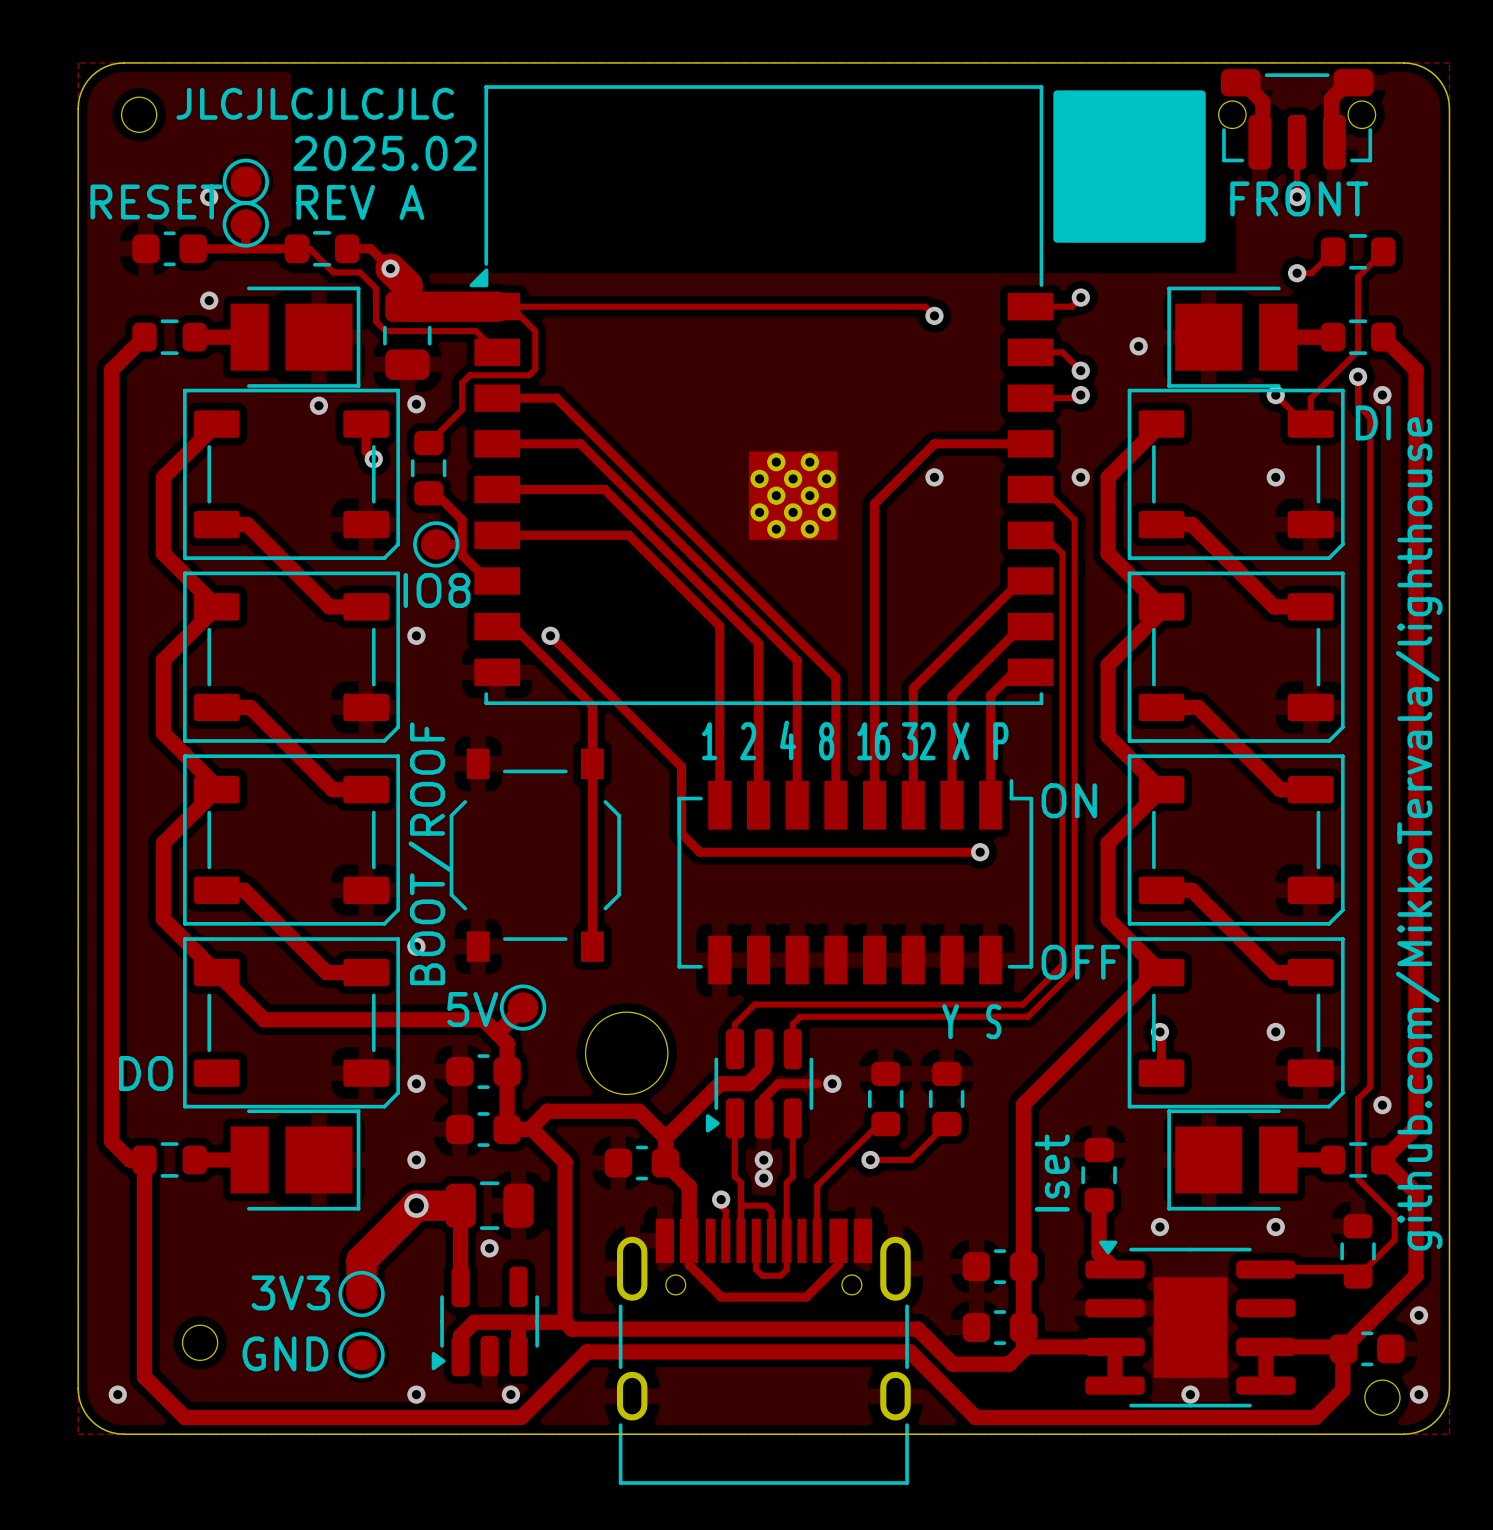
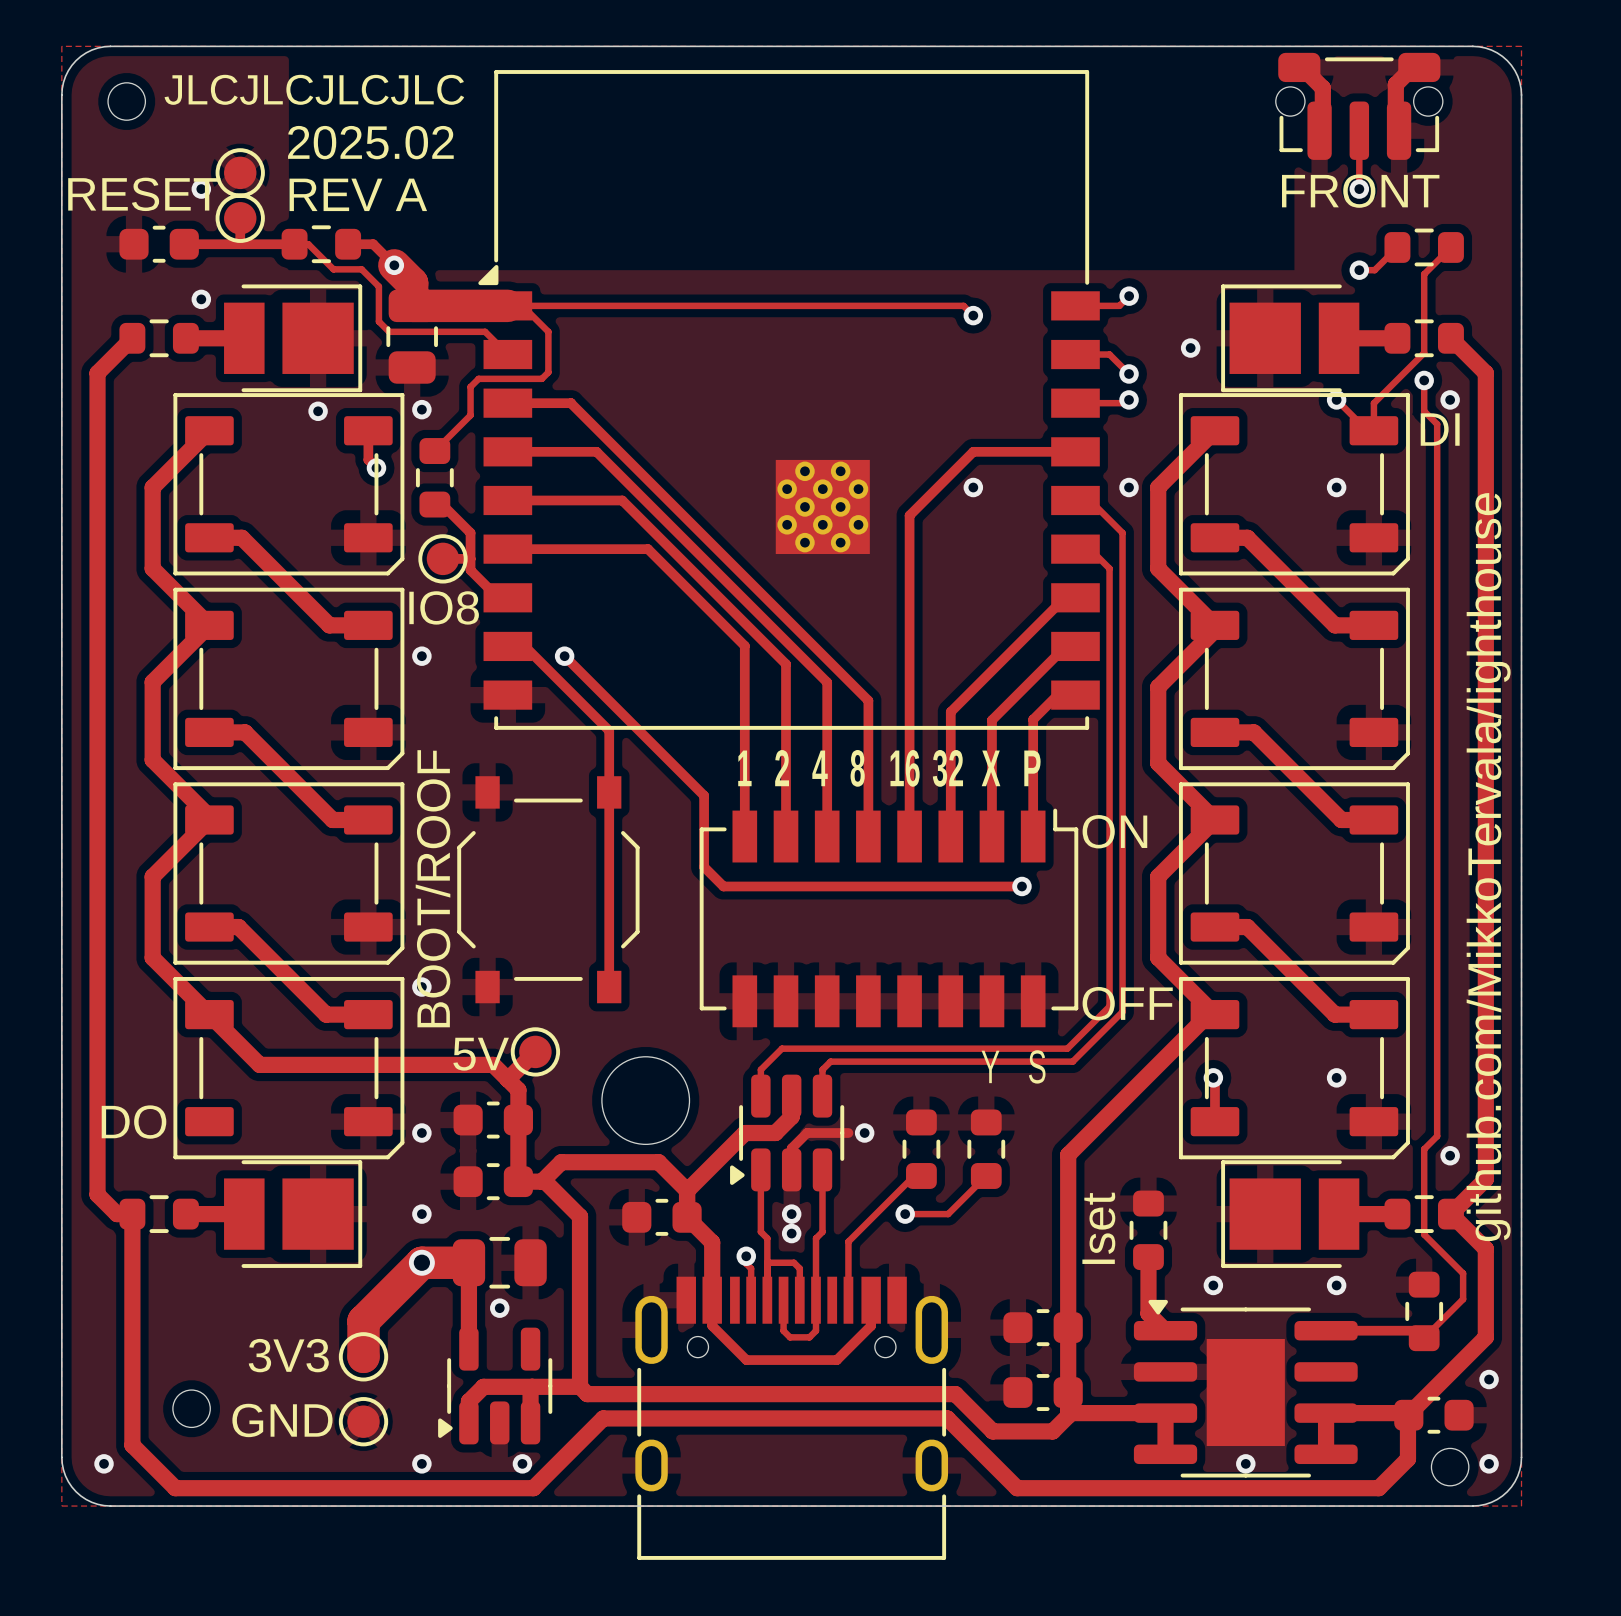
drawing: [1053, 90, 1206, 243] -> none

